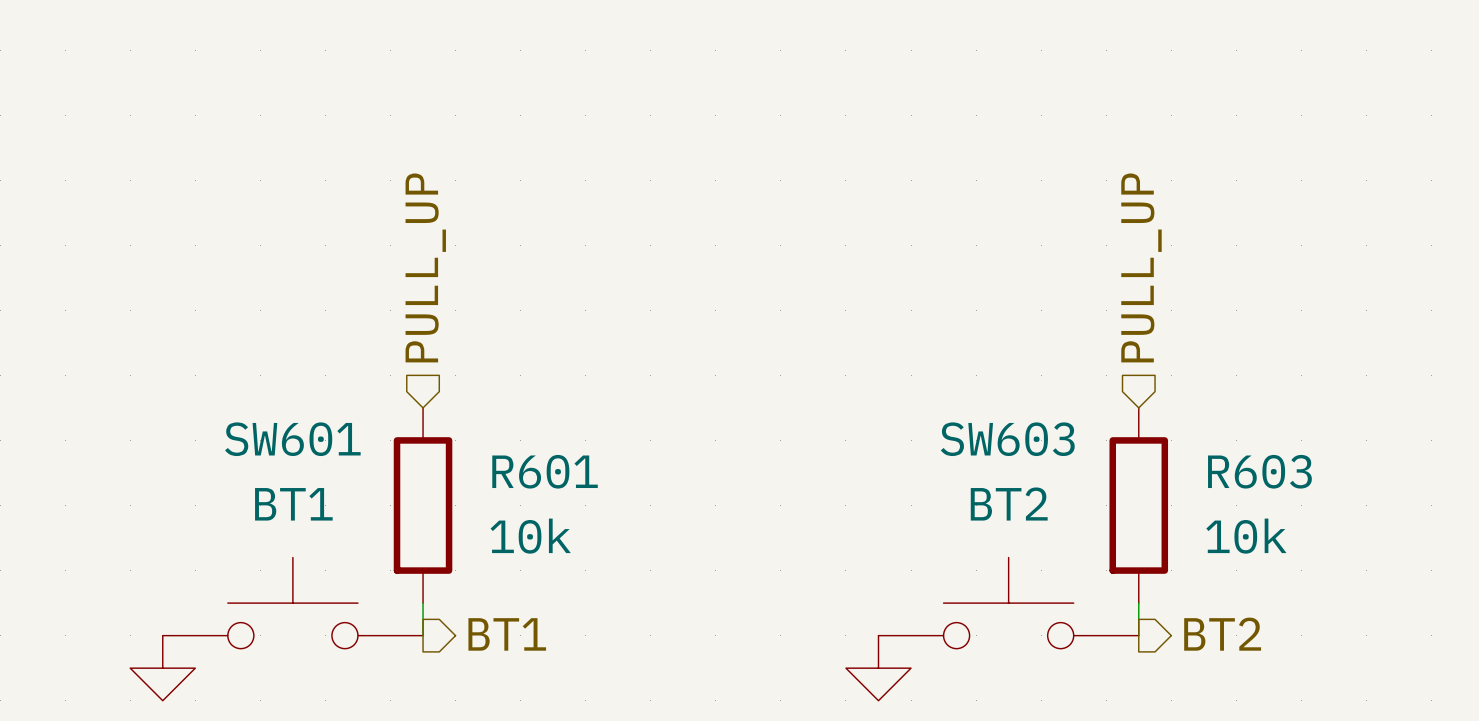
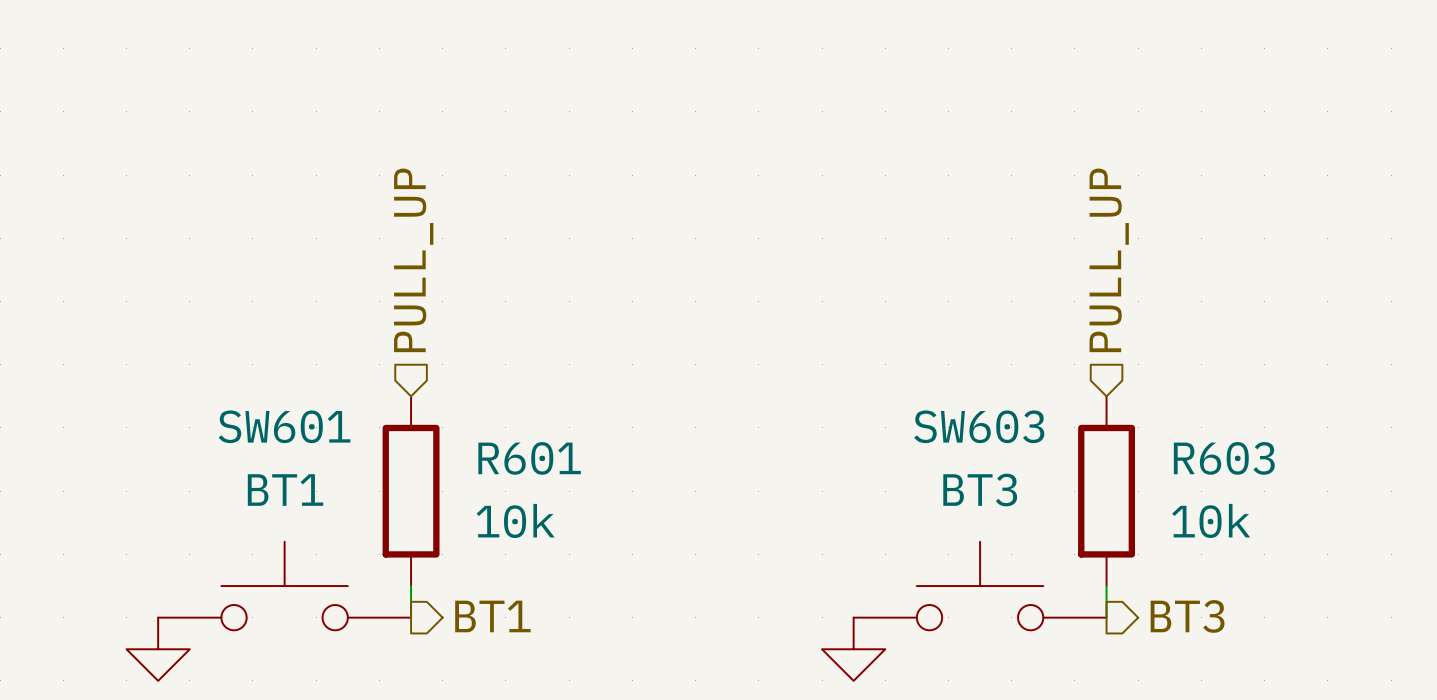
SW603 value: BT2 (1009, 504) -> BT3 (980, 490)
hierarchical label: BT2 (1222, 634) -> BT3 (1187, 616)

